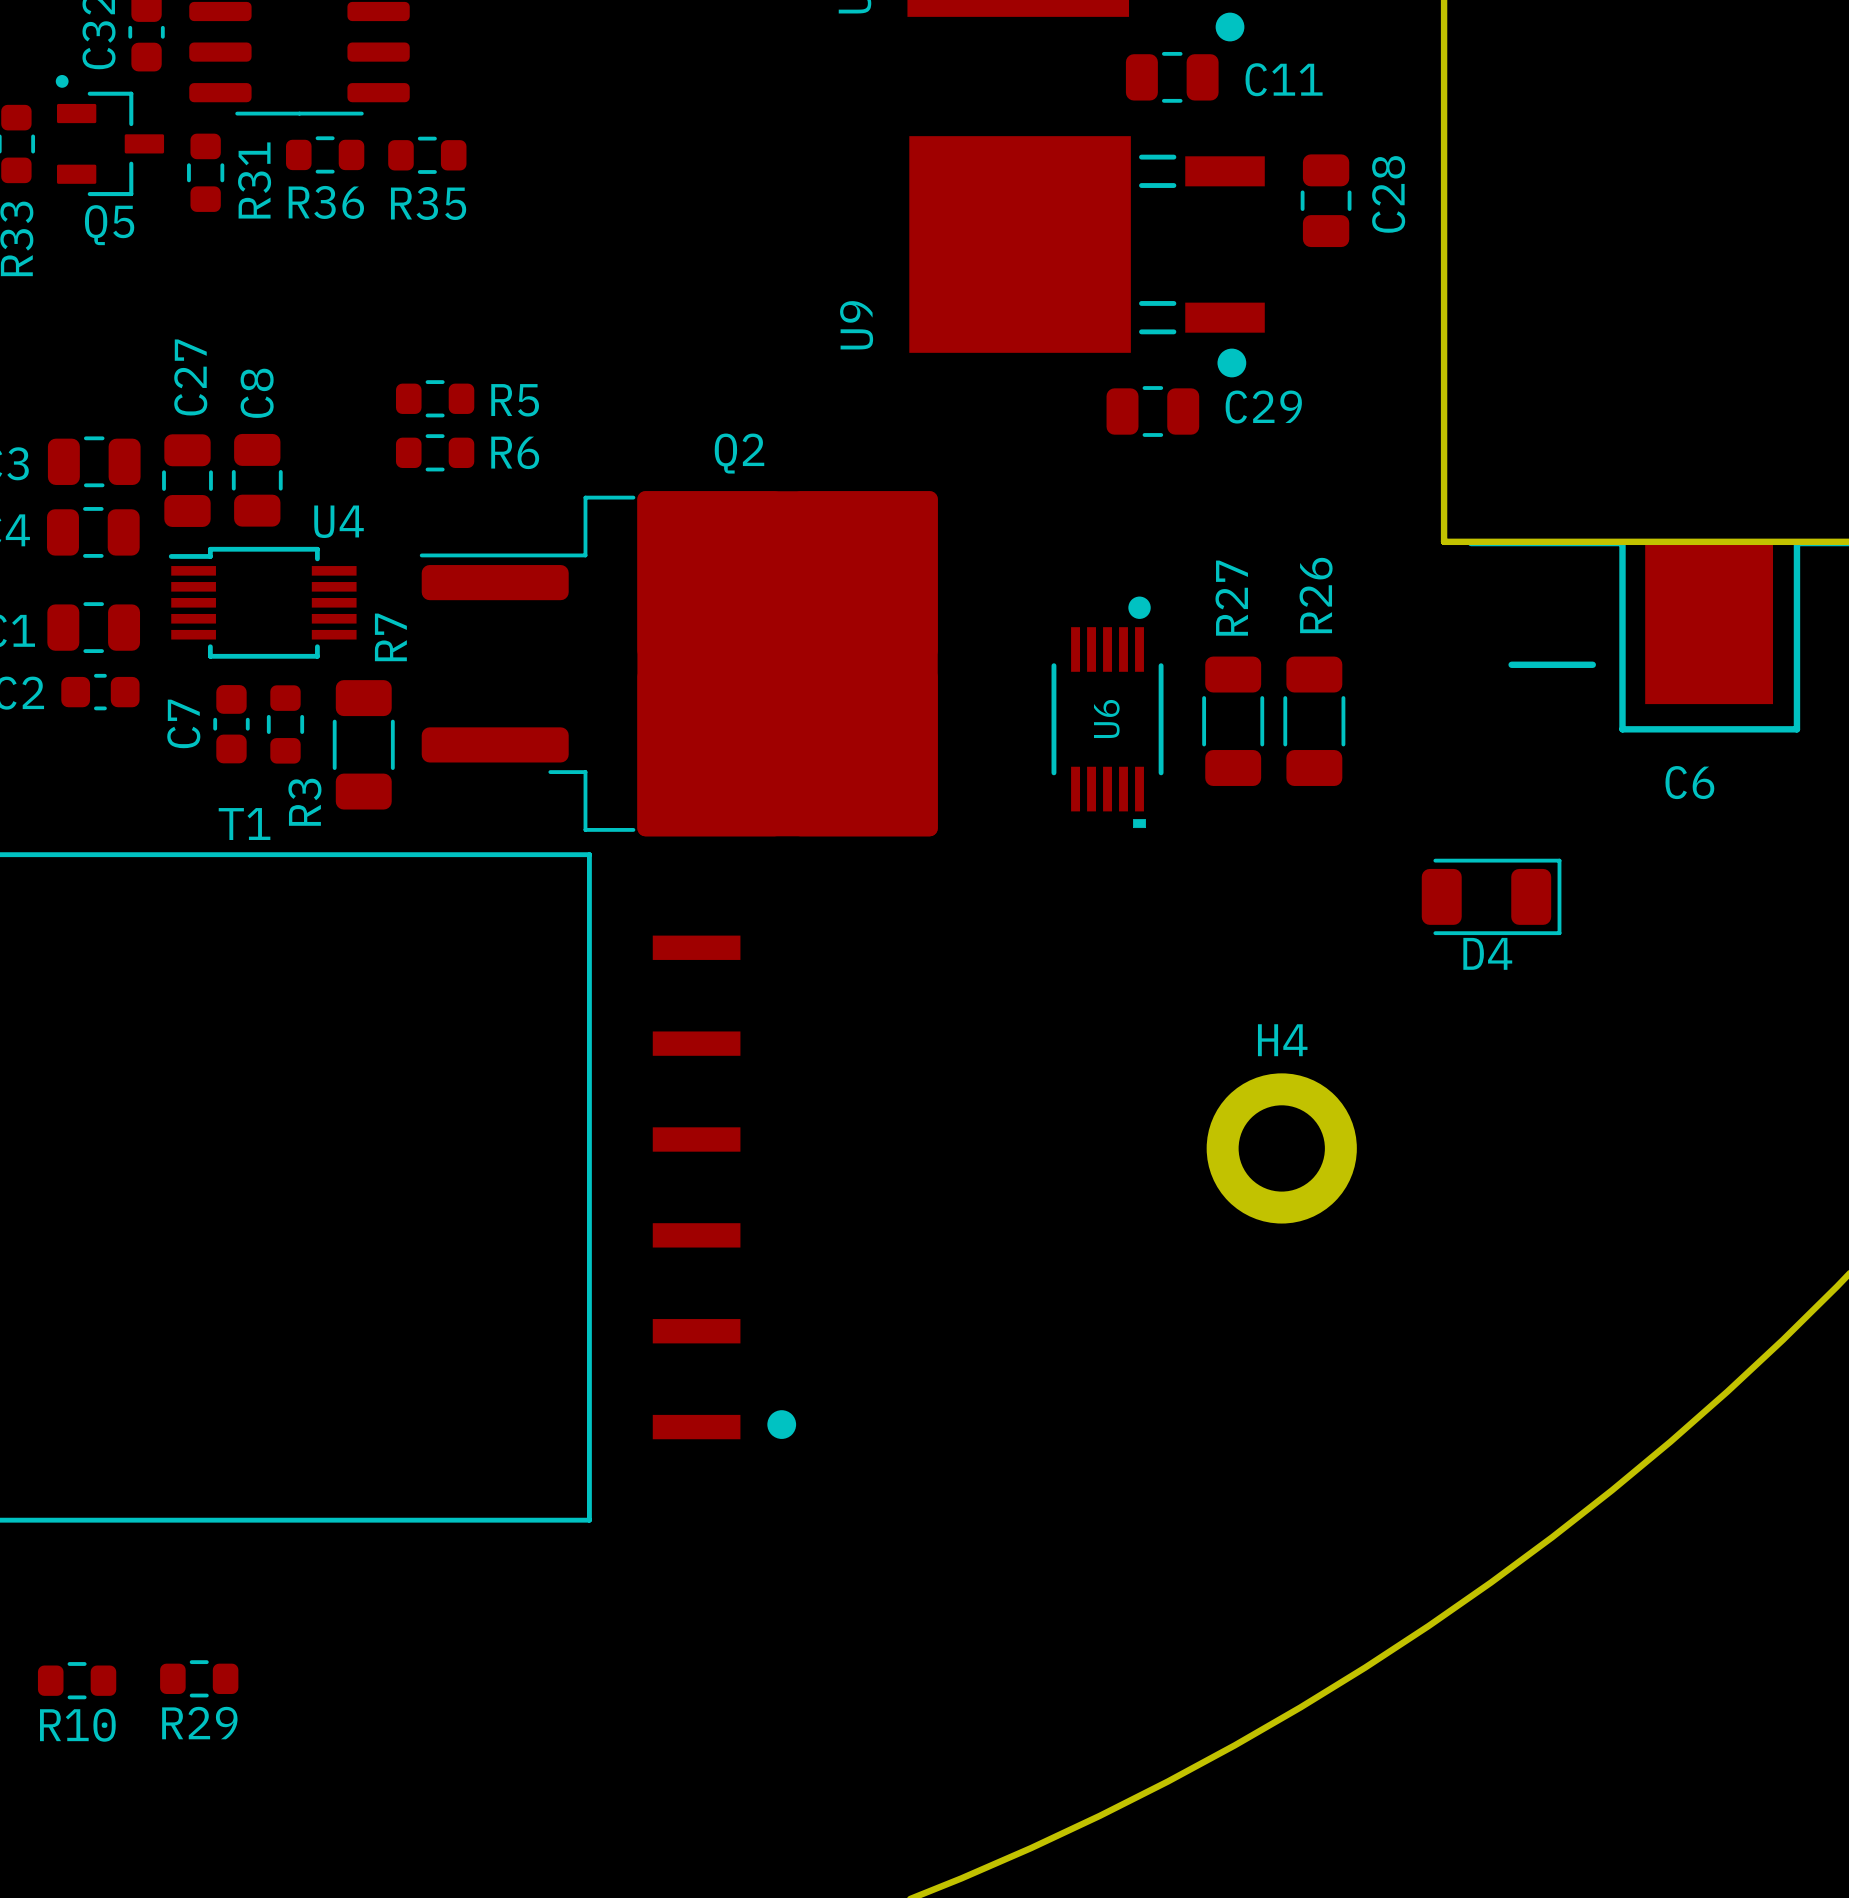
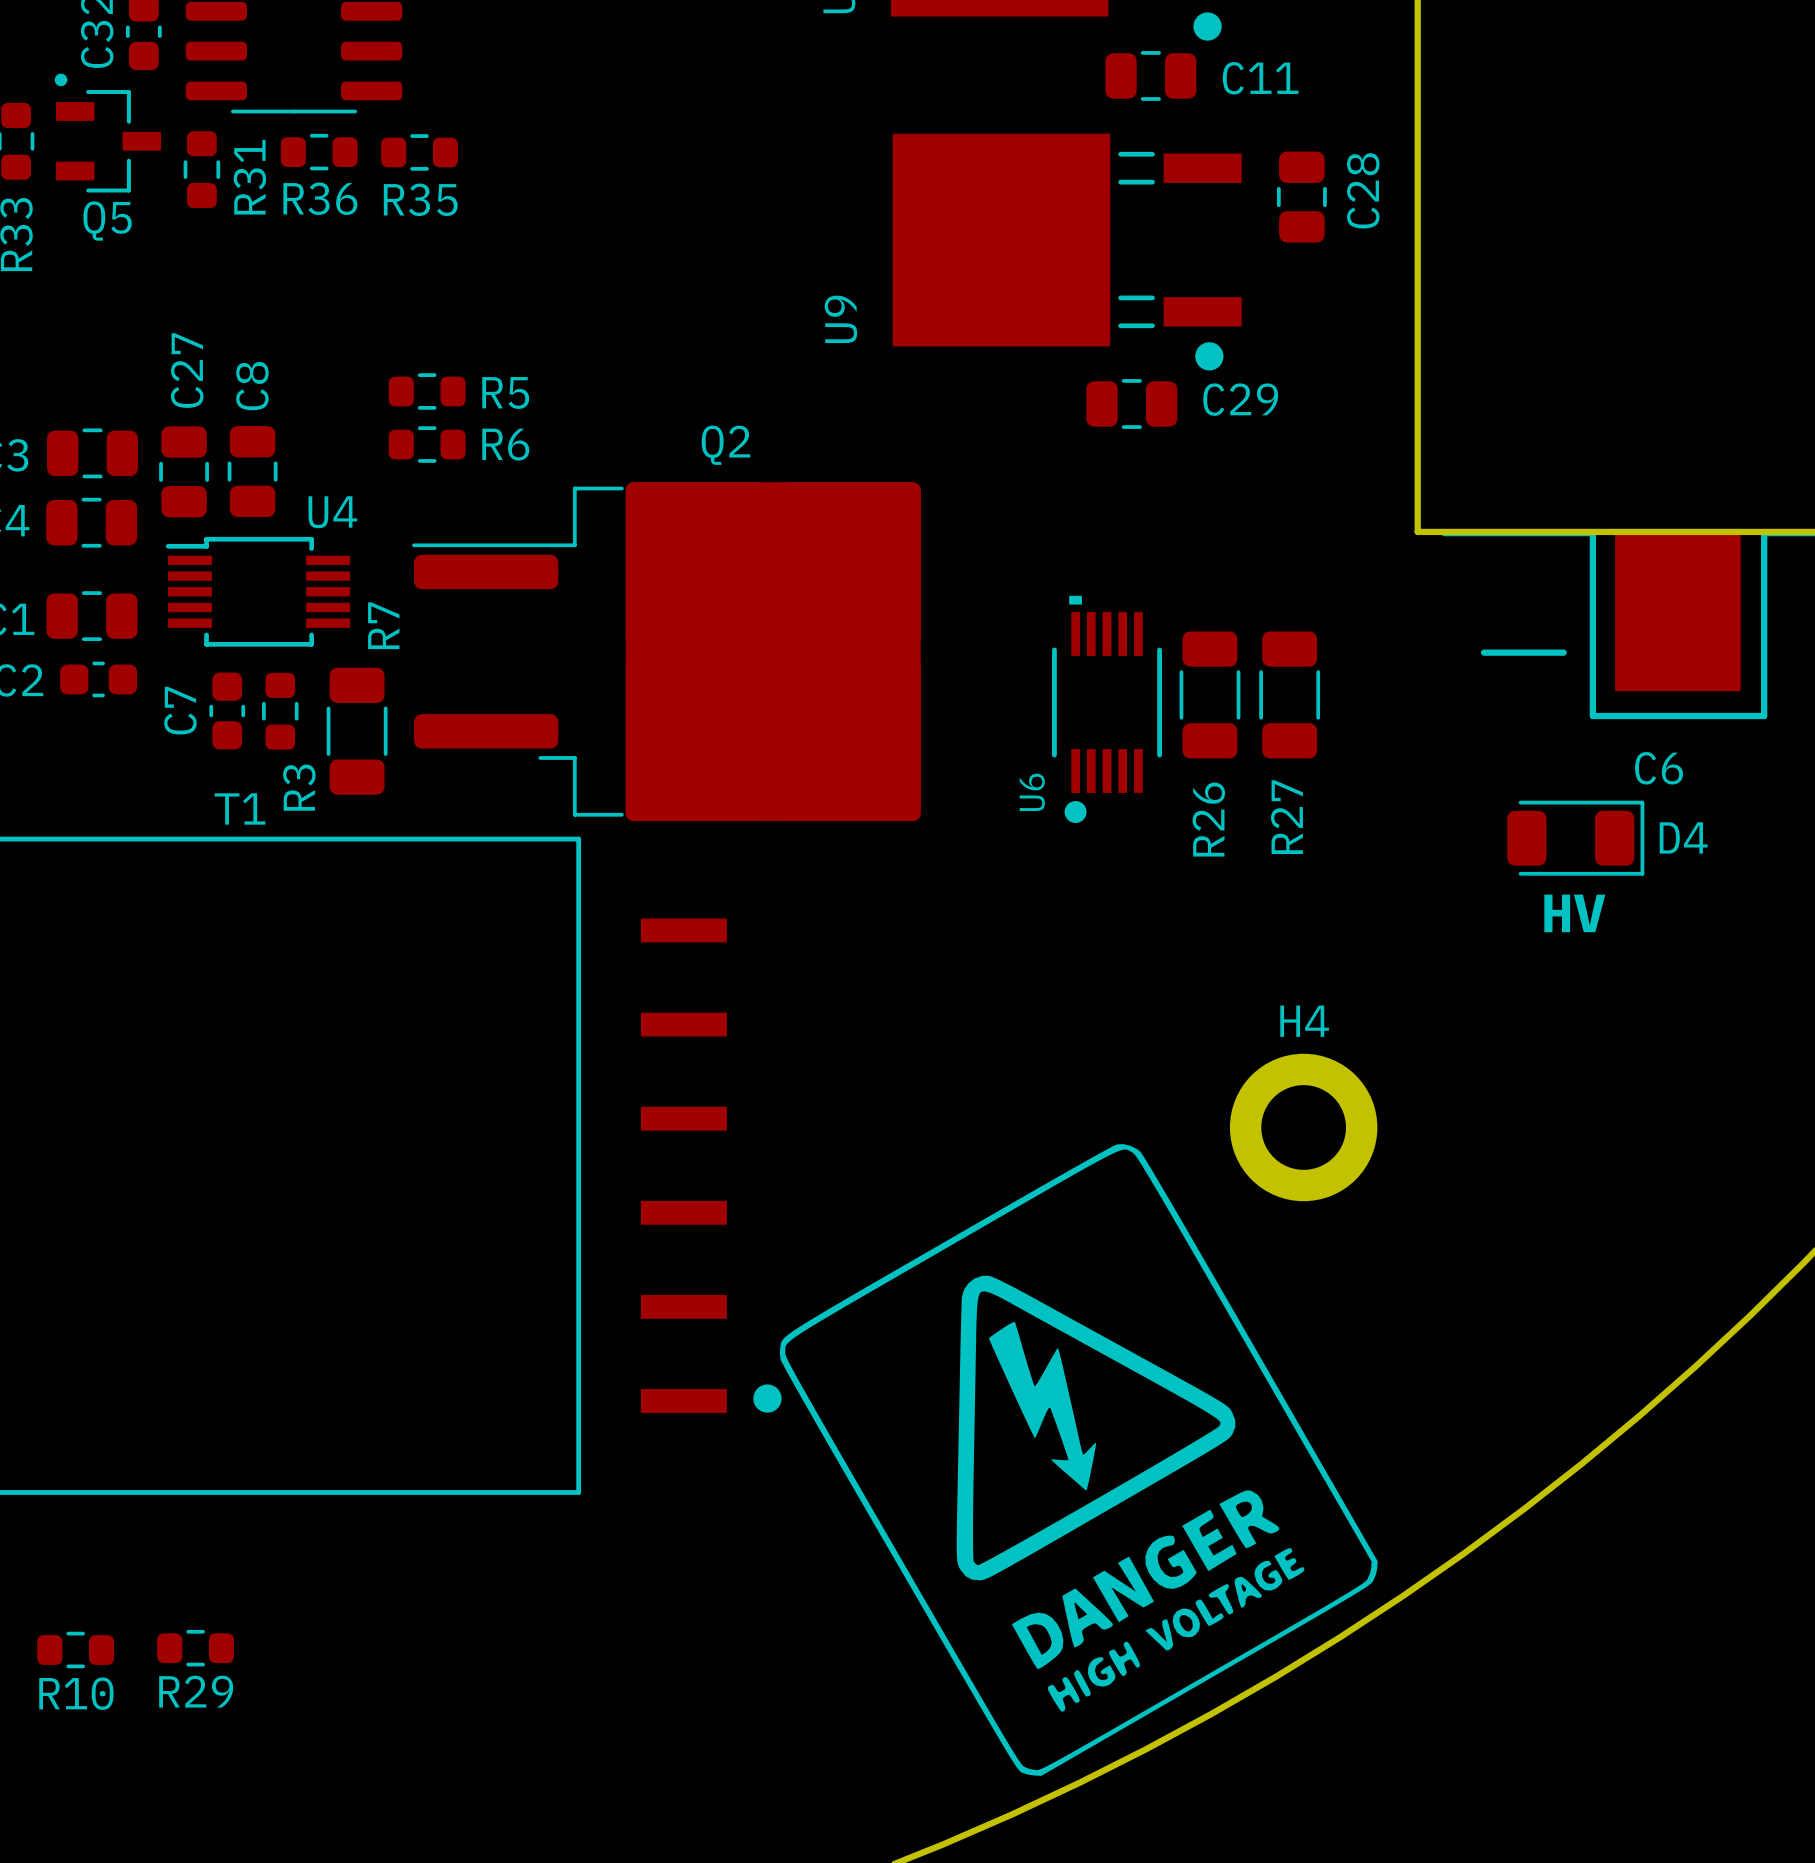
R26 name position: R26 (1316, 595) -> R26 (1208, 819)
R27 name position: R27 (1231, 598) -> R27 (1286, 817)
U6 rotation: 0° (1107, 712) -> 180° (1107, 709)
U6 name position: U6 (1106, 718) -> U6 (1032, 792)
R27 position: (1233, 721) -> (1289, 694)
R26 position: (1314, 721) -> (1209, 694)
D4 position: (1491, 896) -> (1575, 838)
text: none -> HV (1574, 913)
D4 name position: D4 (1487, 953) -> D4 (1683, 837)
H4 position: (1281, 1148) -> (1303, 1127)
drawing: none -> [779, 1144, 1378, 1776]

